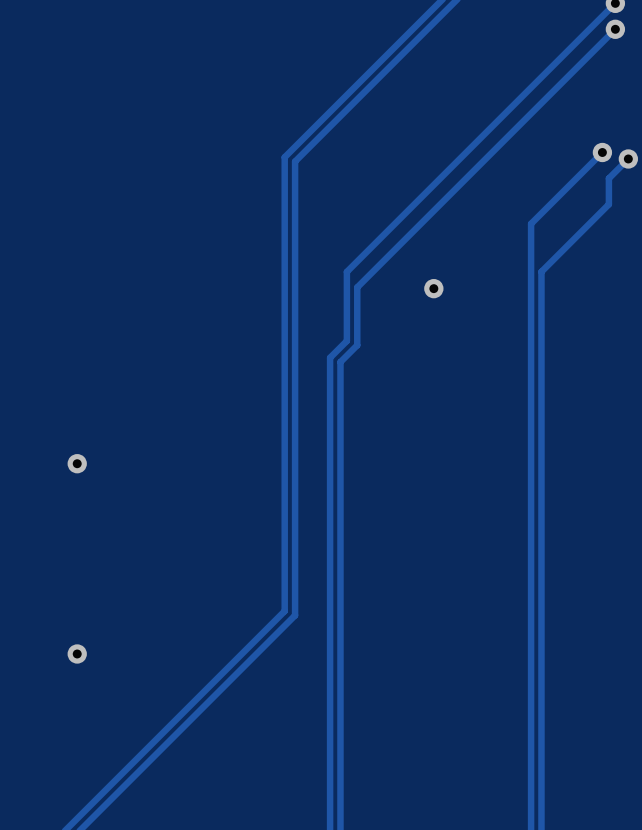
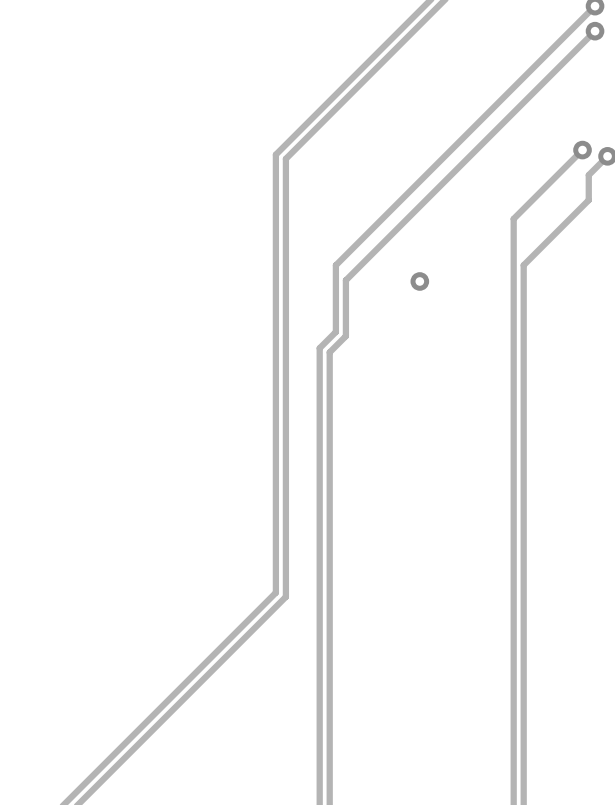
via: (77, 463) -> none
via: (77, 653) -> none

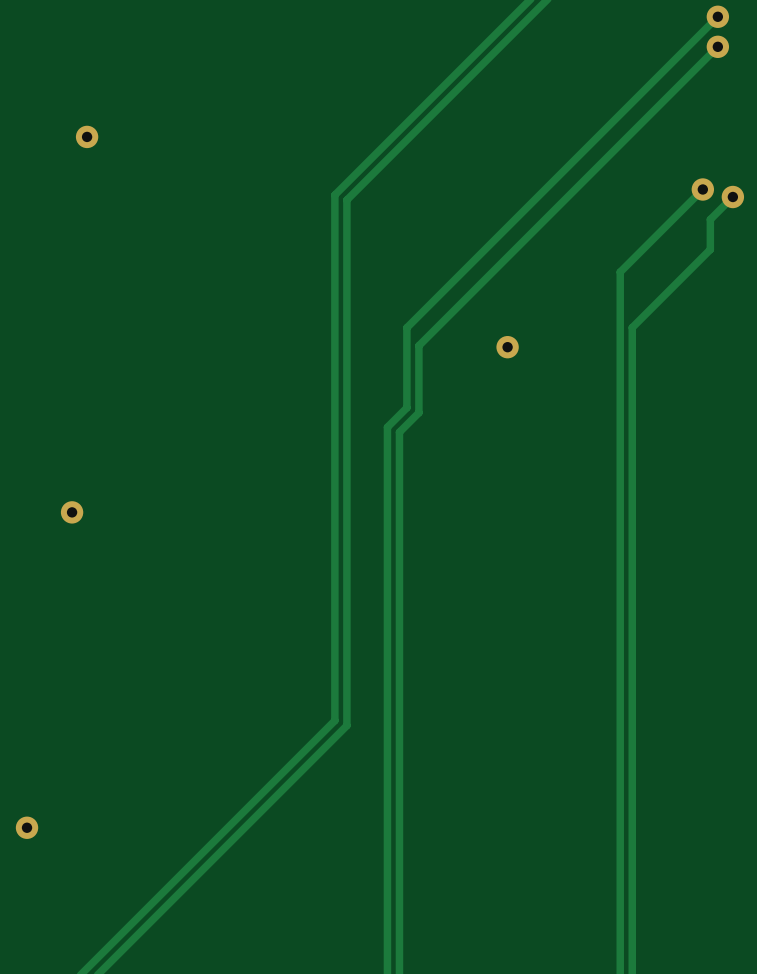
via: none -> (87, 136)
via: none -> (72, 512)
via: none -> (27, 827)

